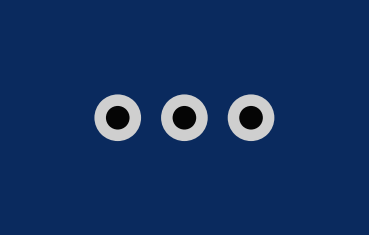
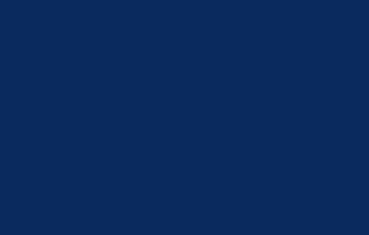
part: (184, 117) -> none

